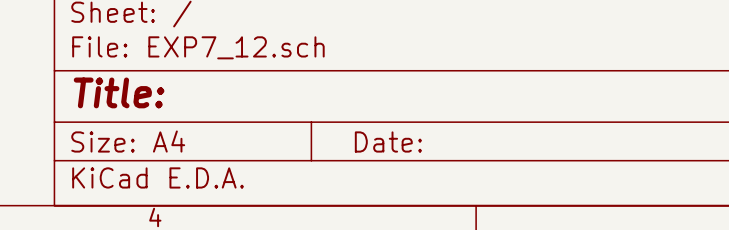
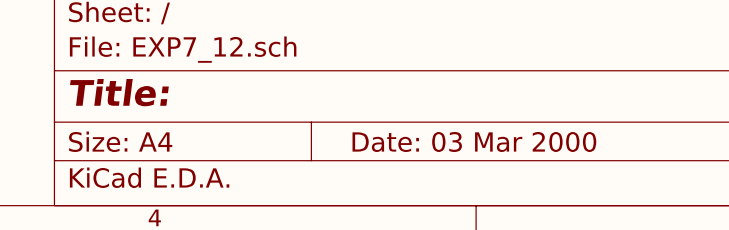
title block: Date: (388, 141) -> Date: 03 Mar 2000 (474, 142)

